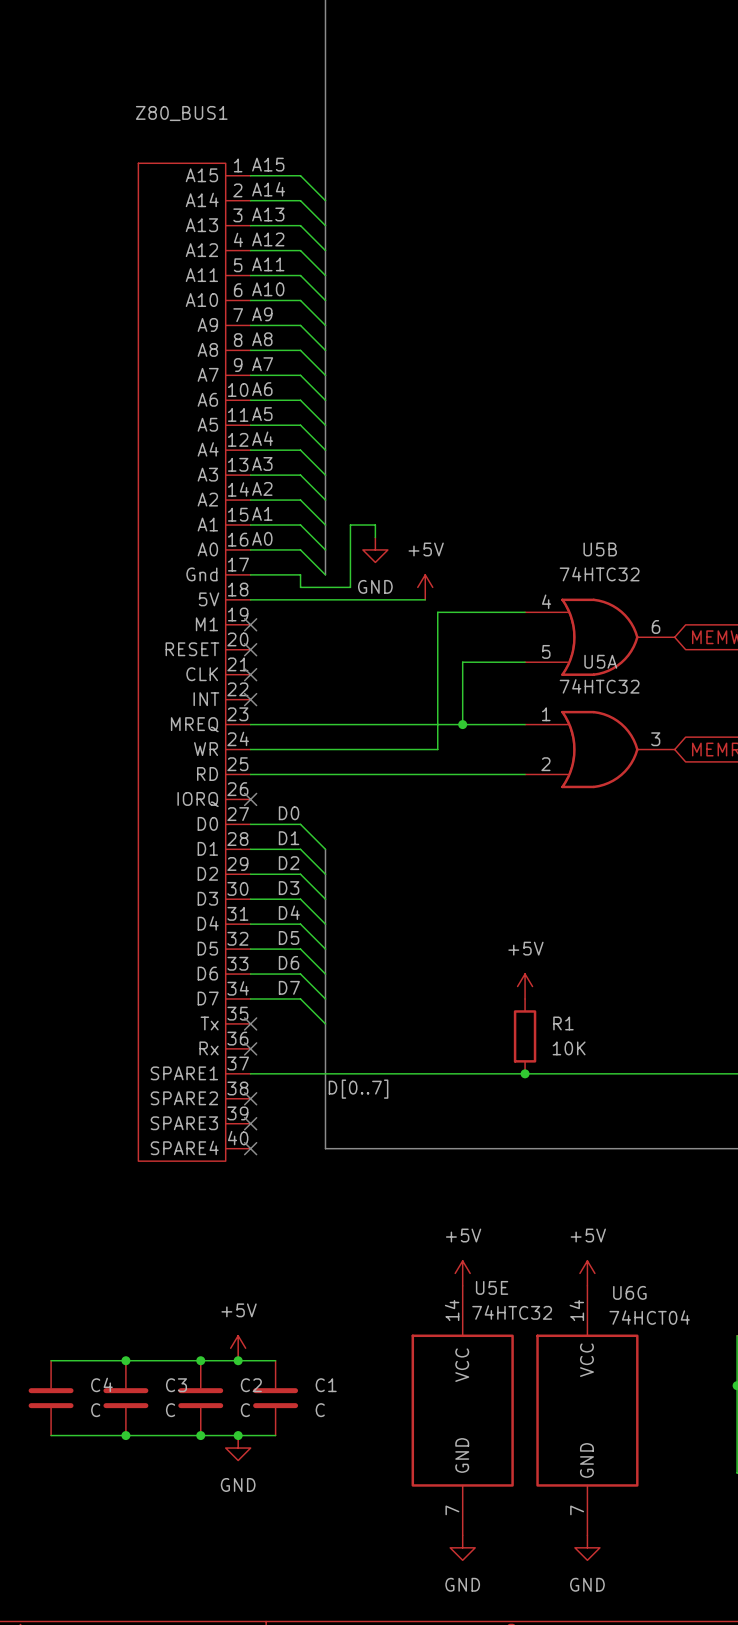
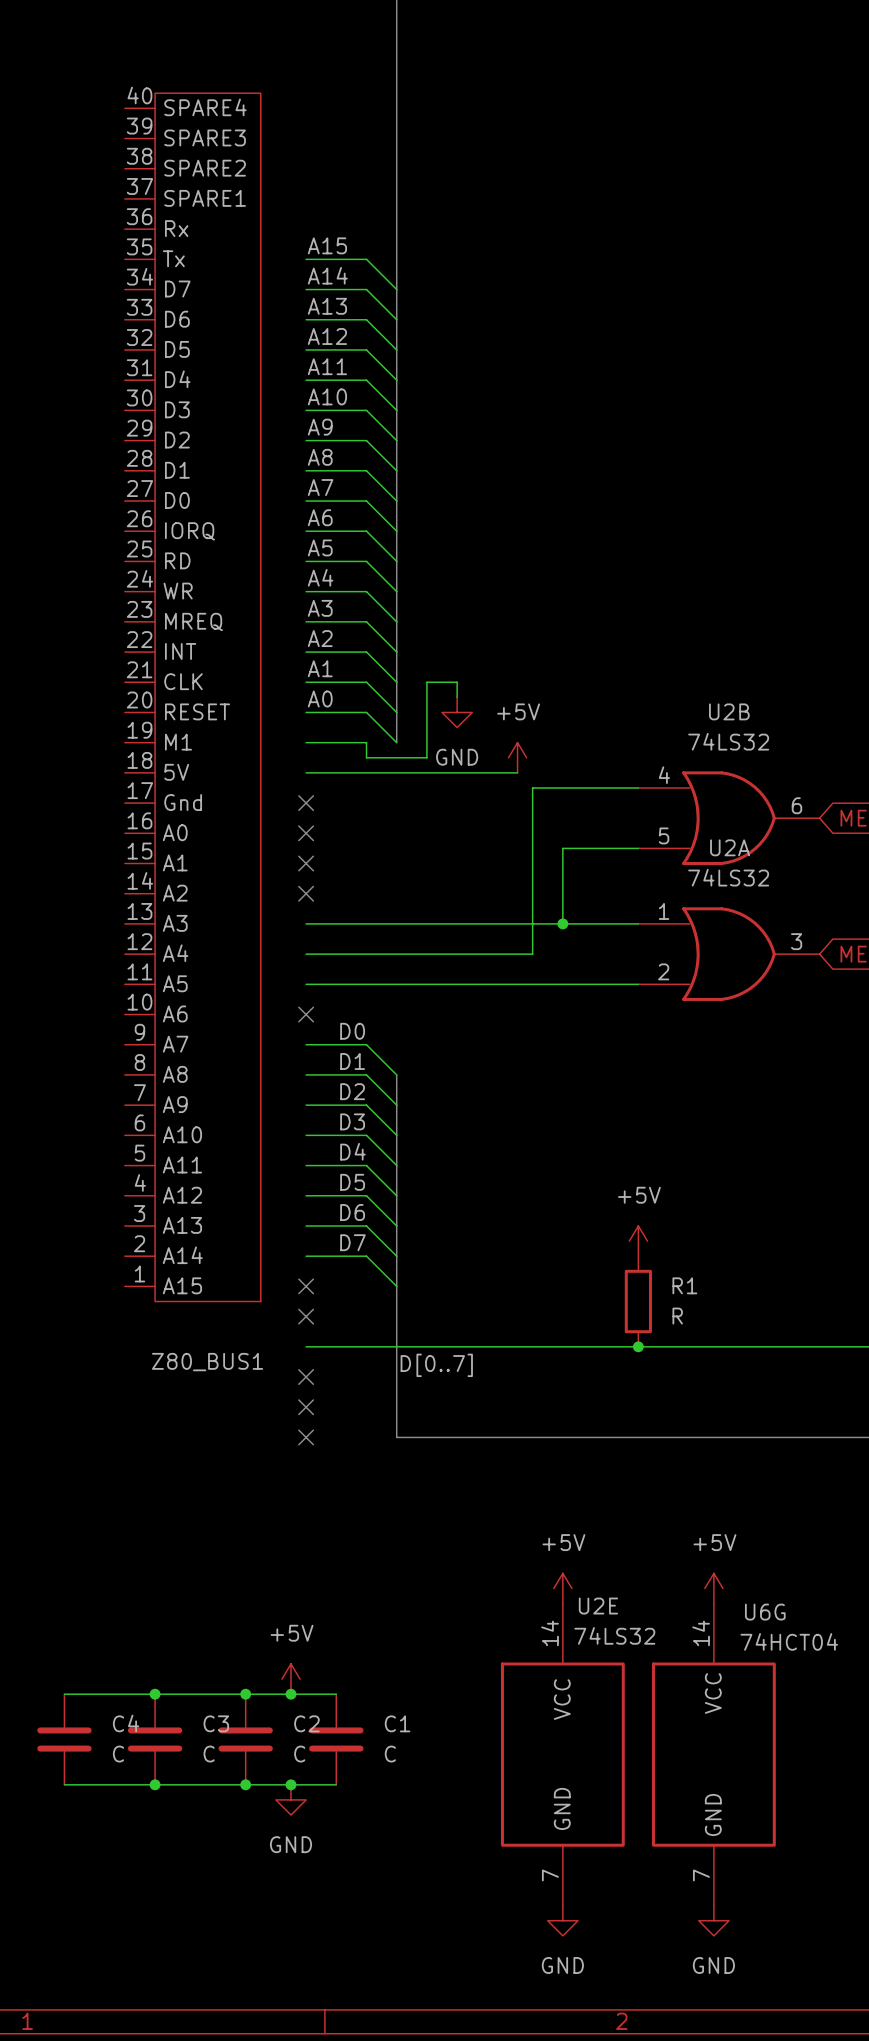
U5B name: U5B (600, 549) -> U2B (729, 711)
U5B value: 74HTC32 (599, 574) -> 74LS32 (728, 741)
U5A name: U5A (600, 661) -> U2A (730, 847)
Z80_BUS1 rotation: 0° (182, 662) -> 180° (207, 697)
U5A value: 74HTC32 (599, 686) -> 74LS32 (728, 877)
R1 value: 10K (569, 1048) -> R (677, 1316)
U5E name: U5E (492, 1287) -> U2E (598, 1606)
U5E value: 74HTC32 (512, 1312) -> 74LS32 (614, 1635)

